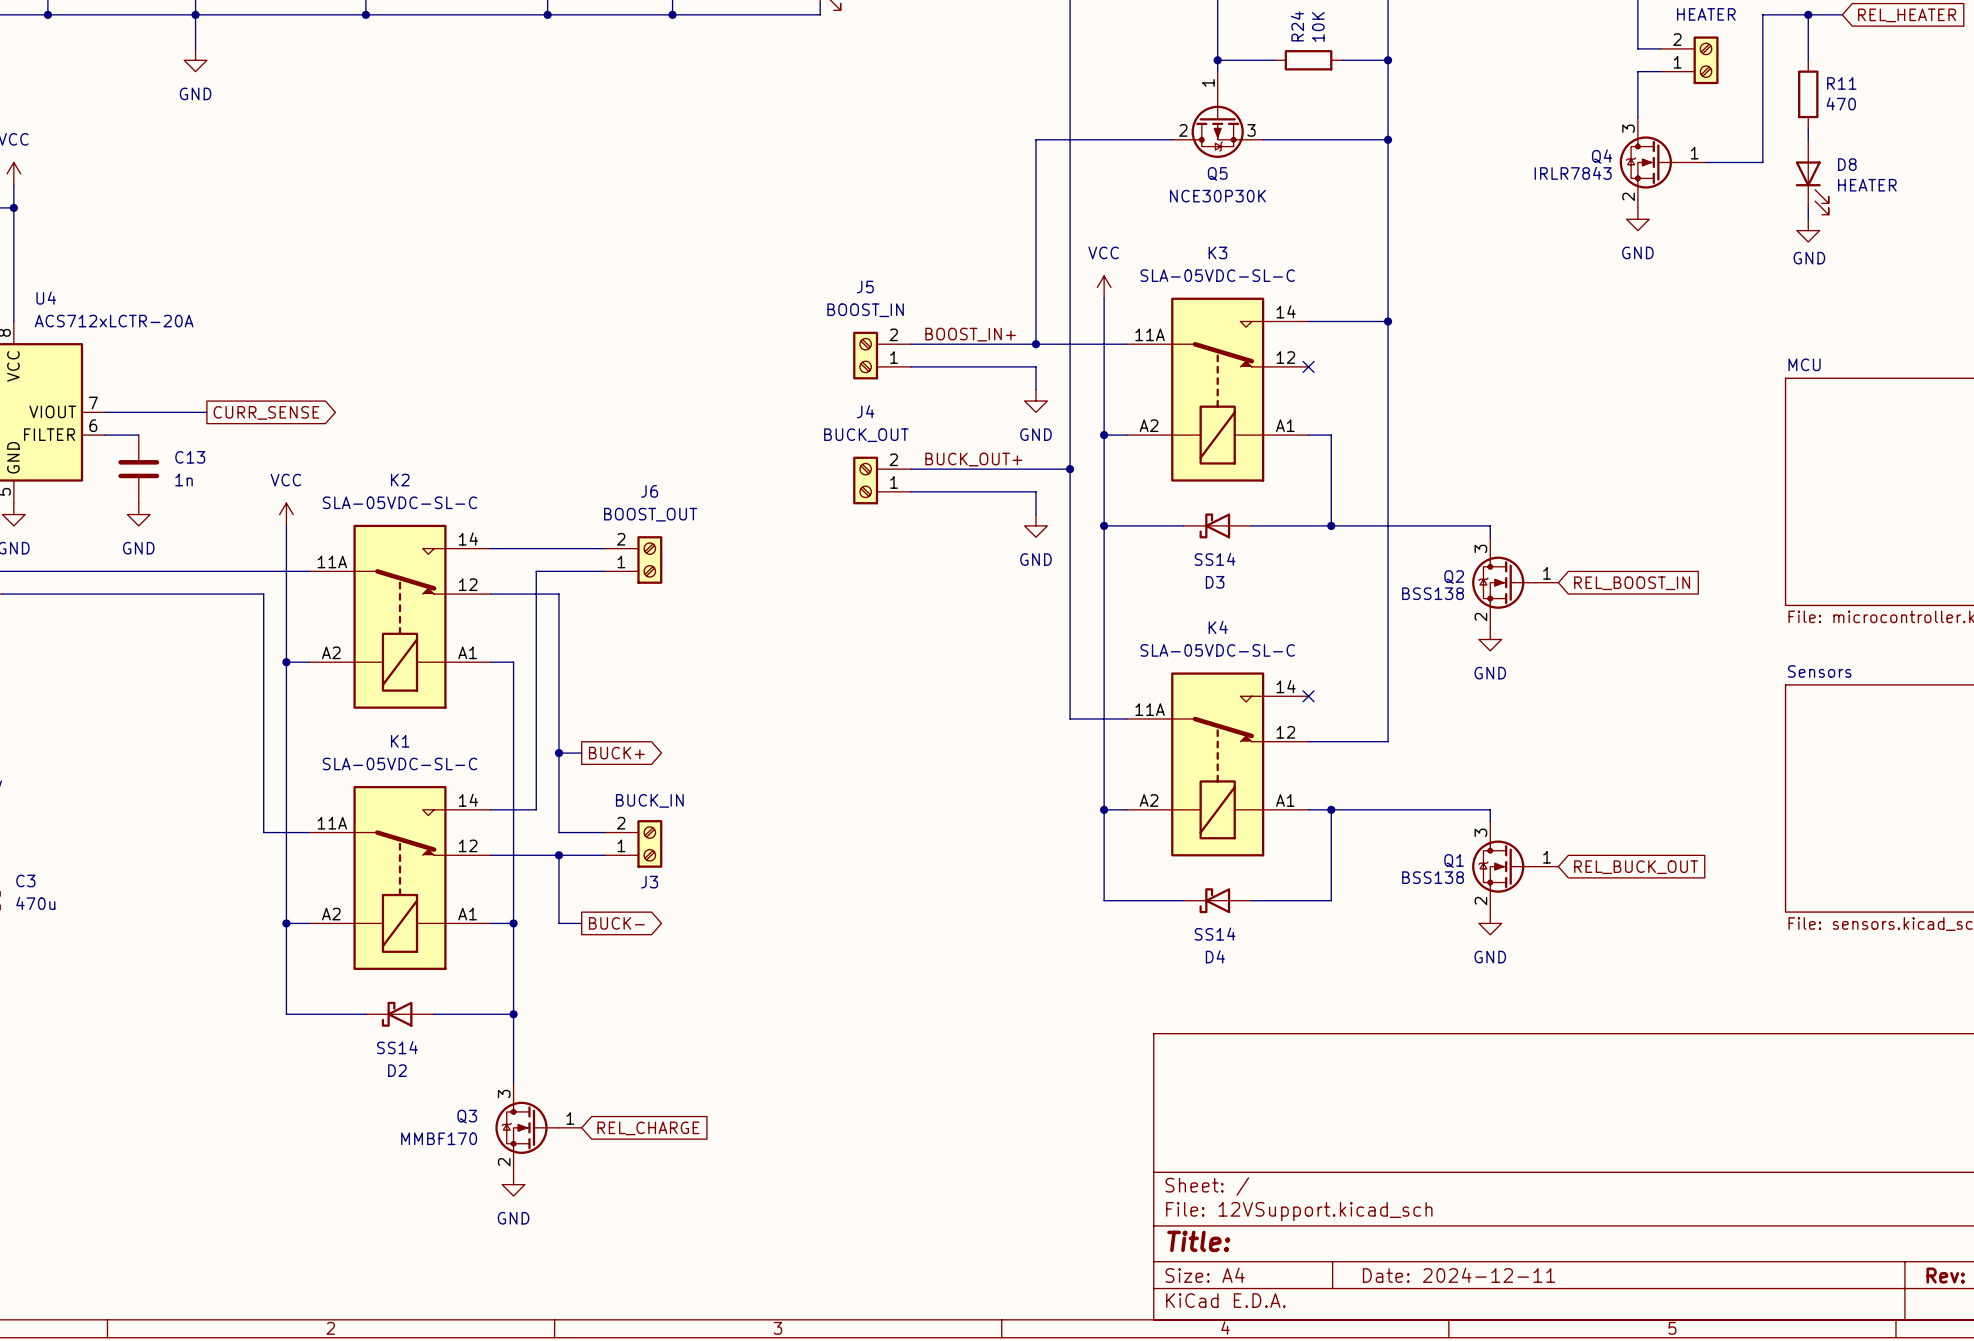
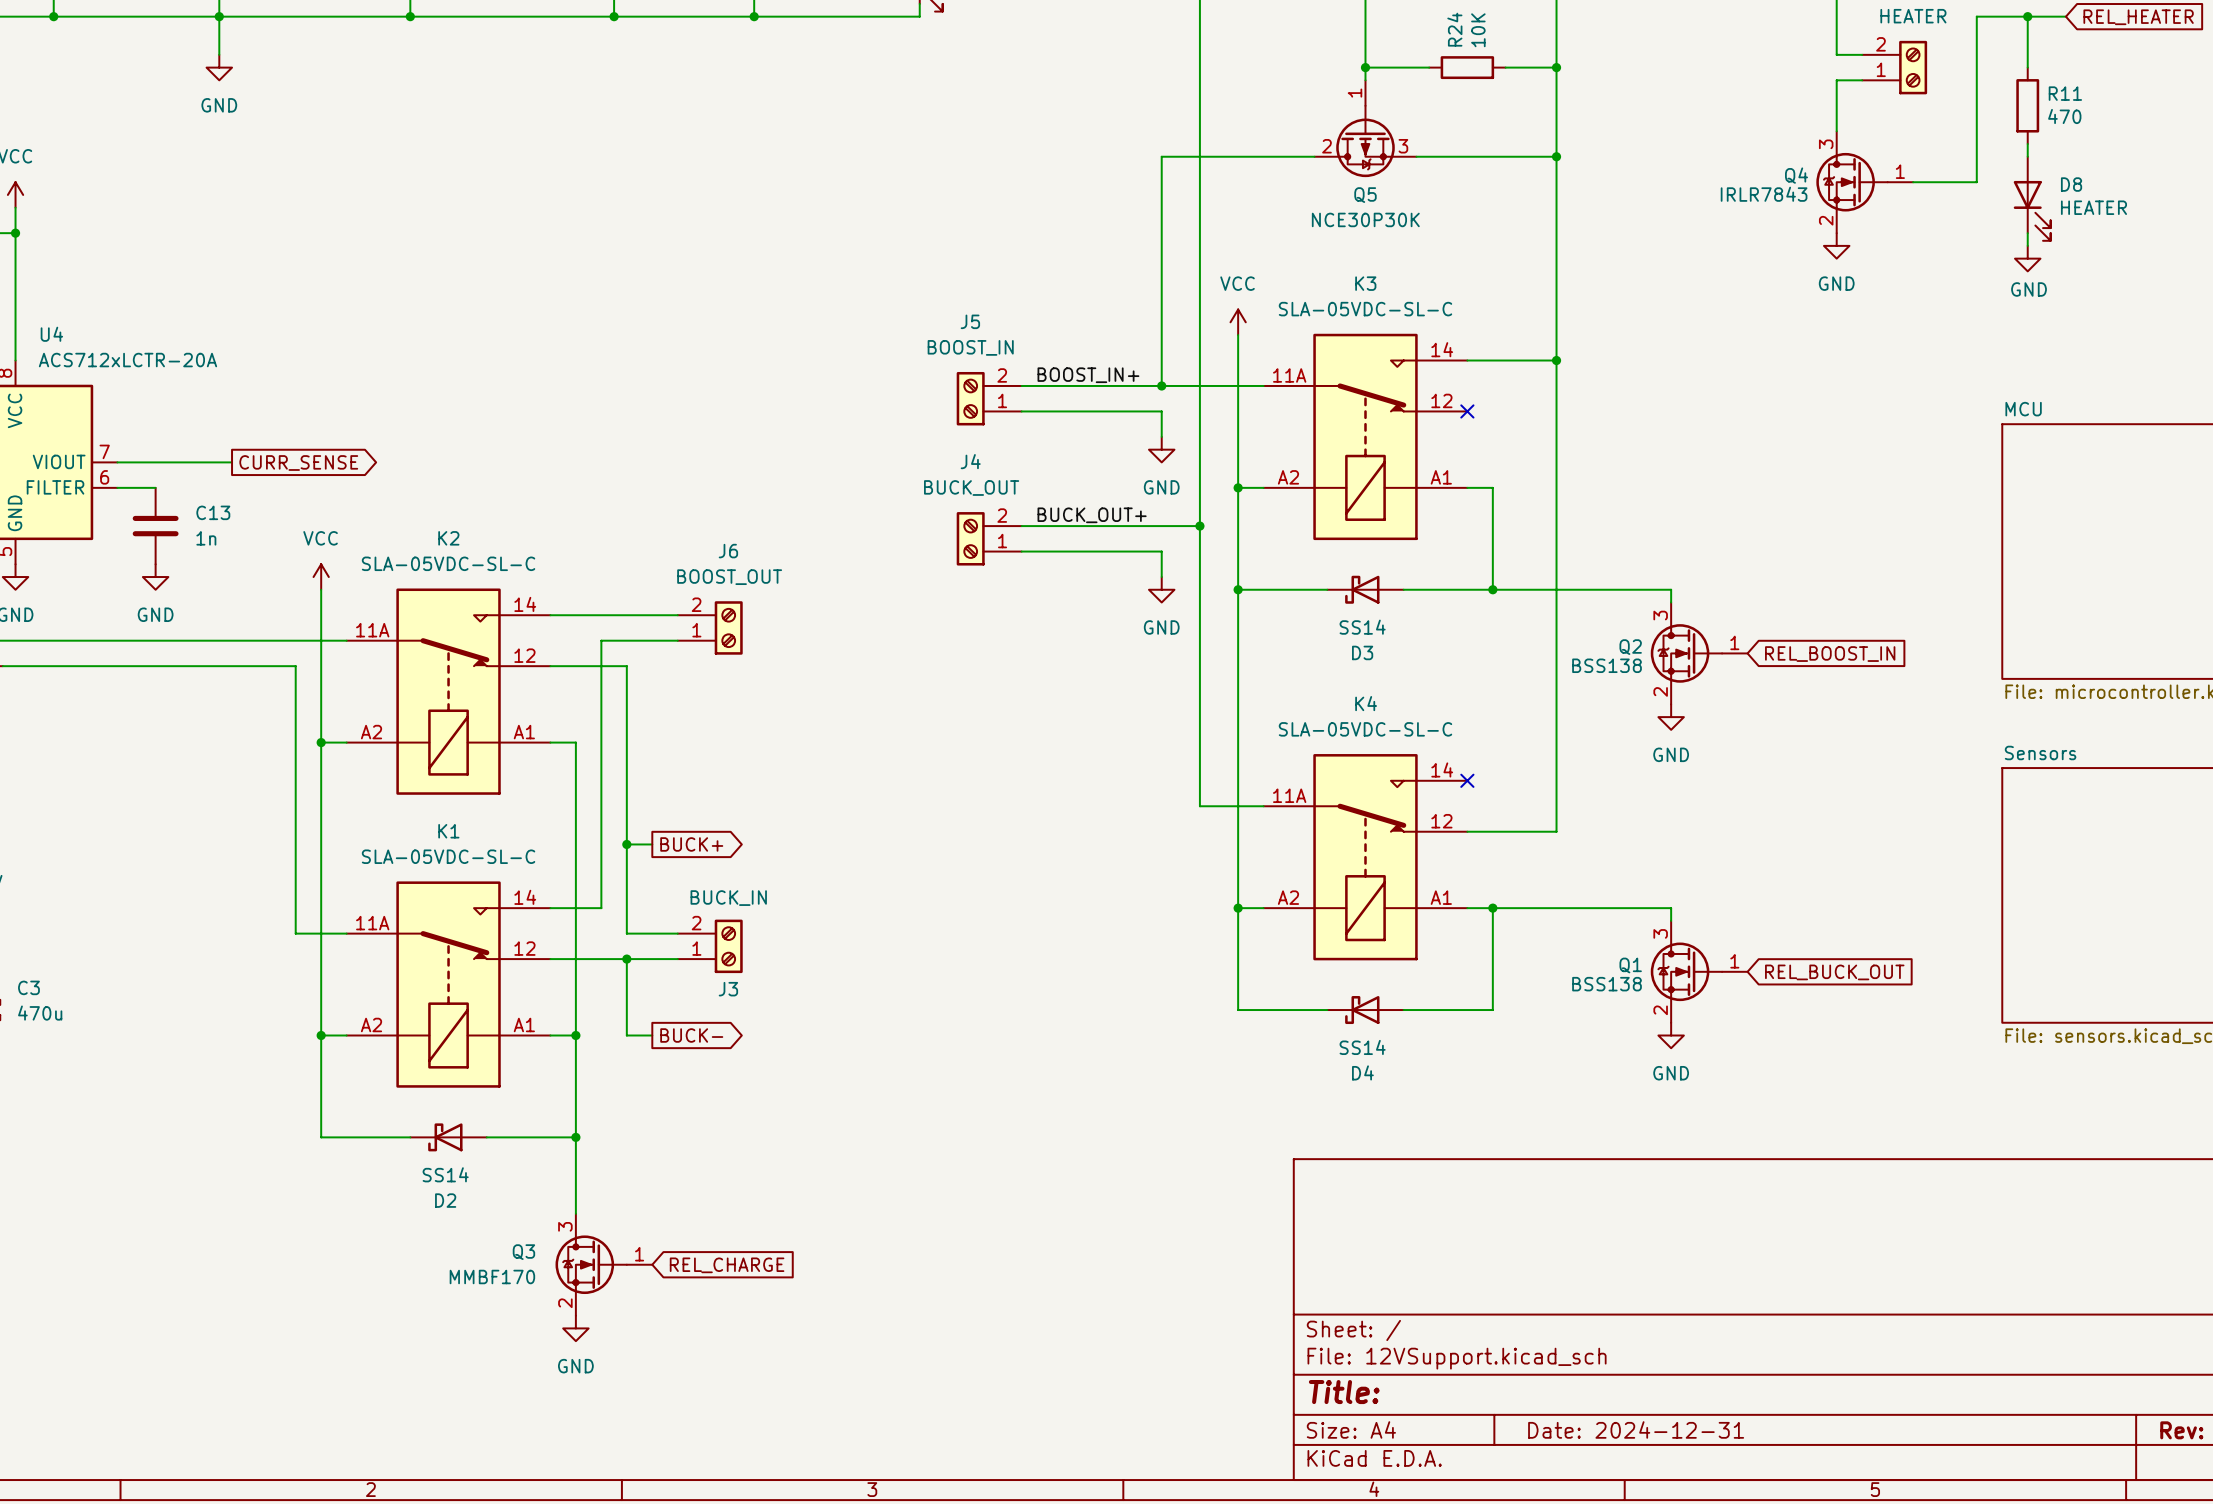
title block: Date: 2024-12-11 (1459, 1275) -> Date: 2024-12-31 (1636, 1429)

